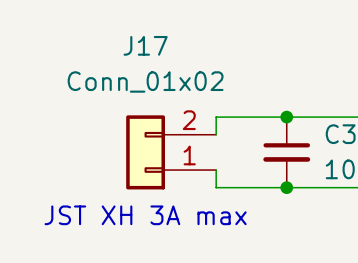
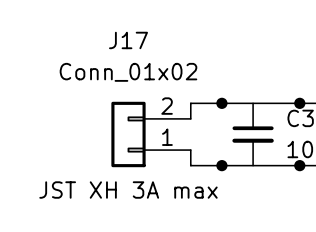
junction: none -> (221, 103)
junction: (286, 117) -> none
junction: none -> (299, 103)
junction: none -> (221, 165)
junction: (286, 187) -> none
junction: none -> (299, 165)

